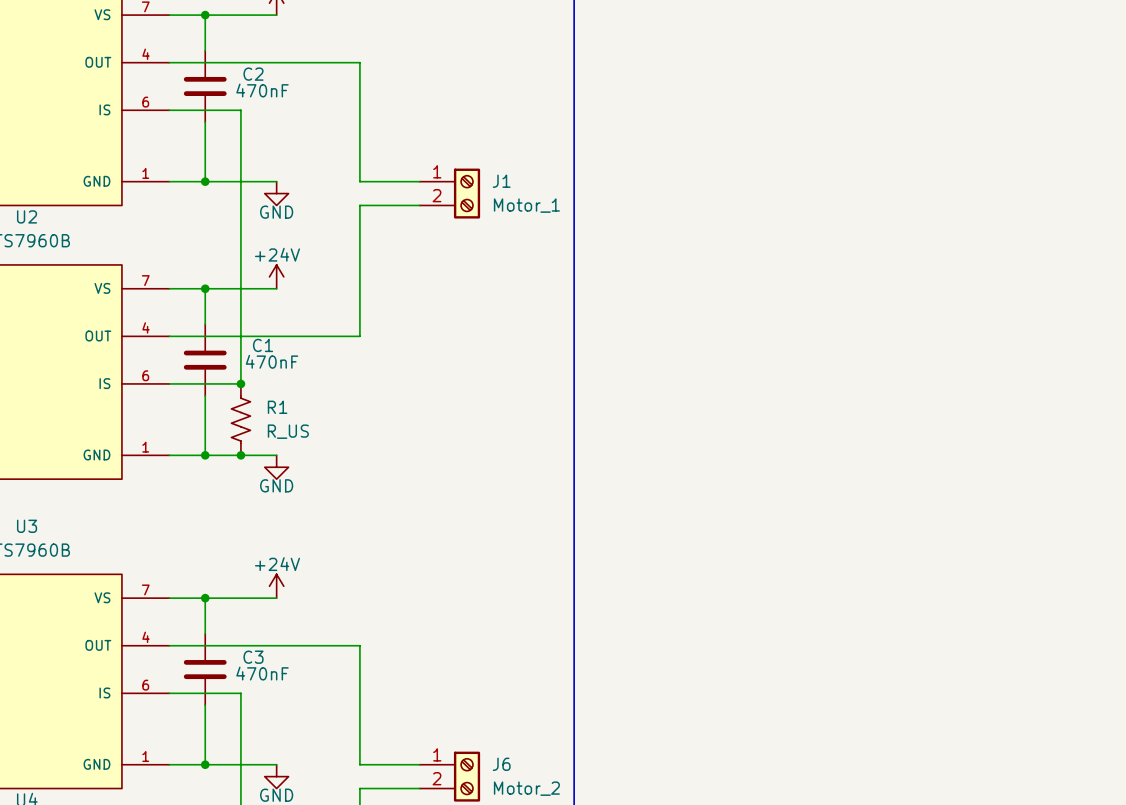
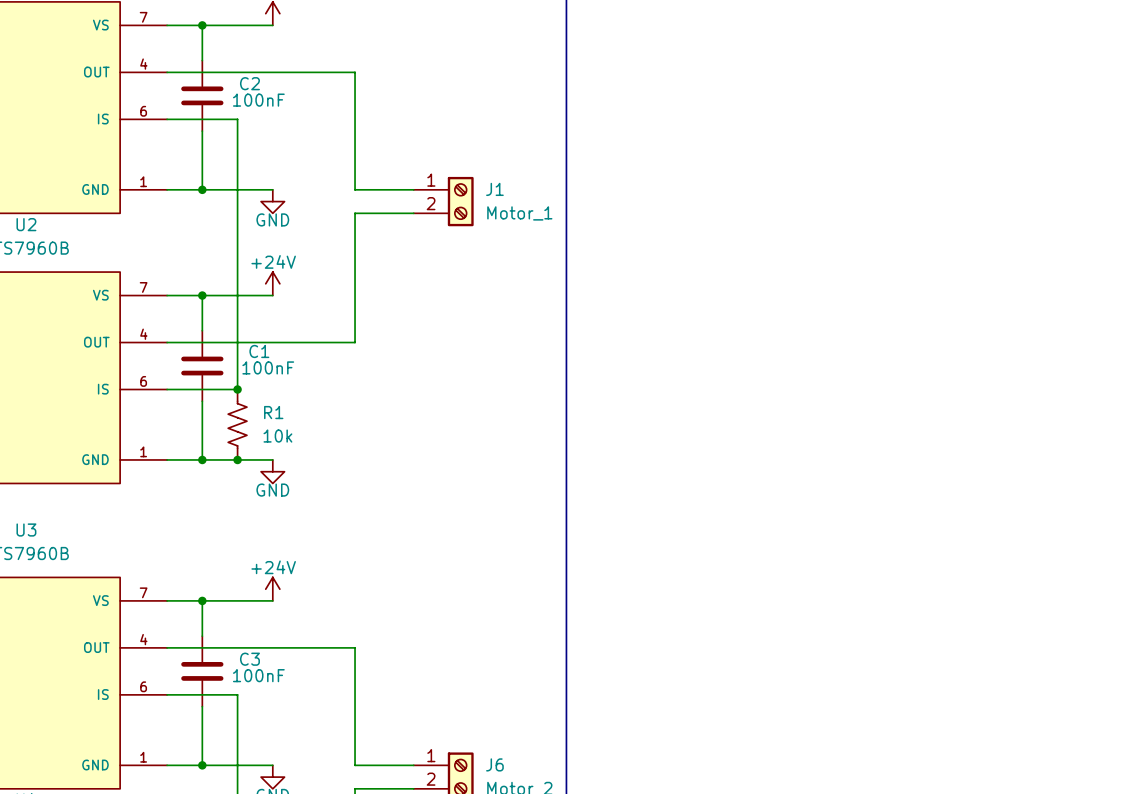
C2 value: 470nF (262, 90) -> 100nF (258, 100)
C1 value: 470nF (272, 361) -> 100nF (268, 367)
R1 value: R_US (288, 431) -> 10k (277, 436)
C3 value: 470nF (262, 673) -> 100nF (258, 675)

